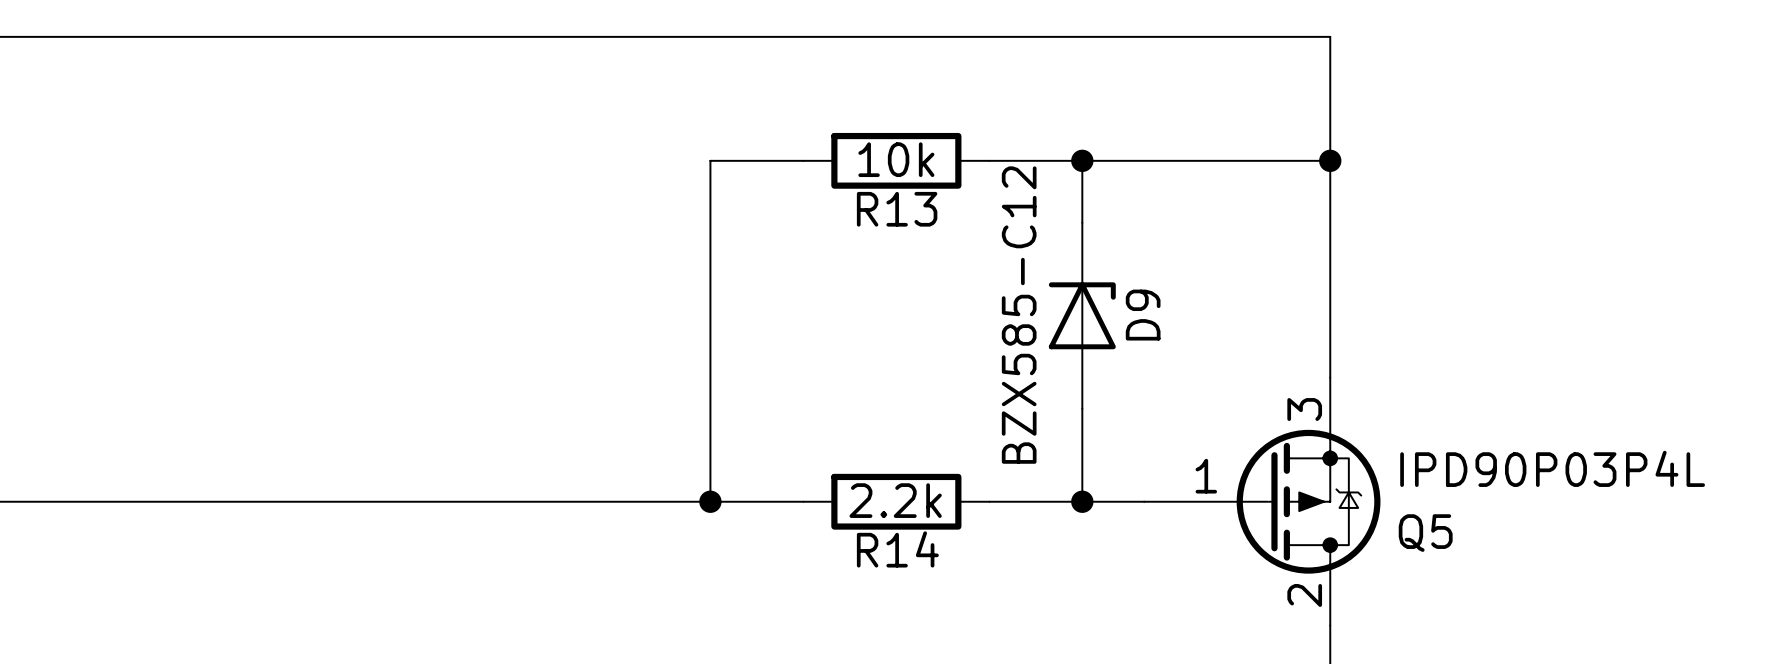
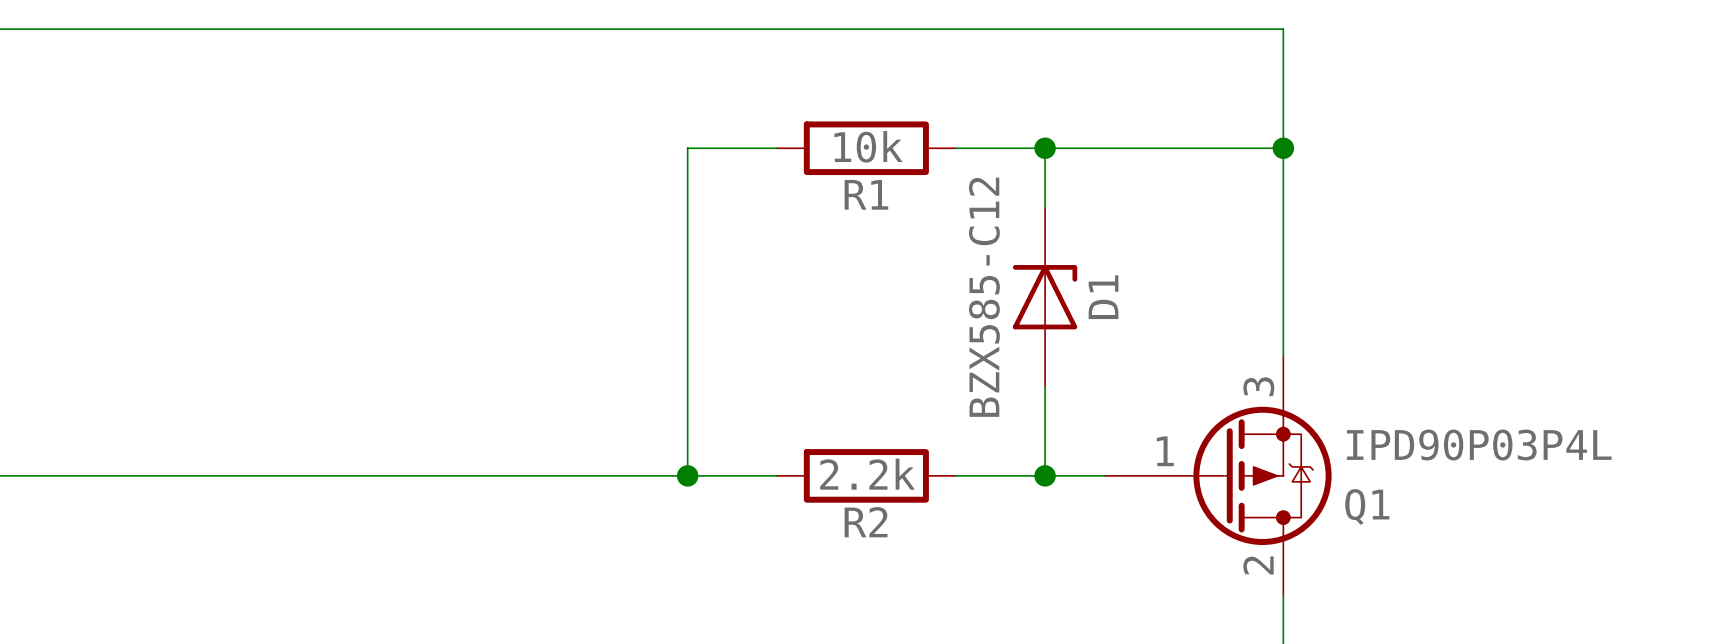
R13 name: R13 (897, 209) -> R1 (866, 194)
D9 name: D9 (1143, 315) -> D1 (1103, 297)
Q5 name: Q5 (1425, 533) -> Q1 (1367, 506)
R14 name: R14 (897, 549) -> R2 (866, 522)

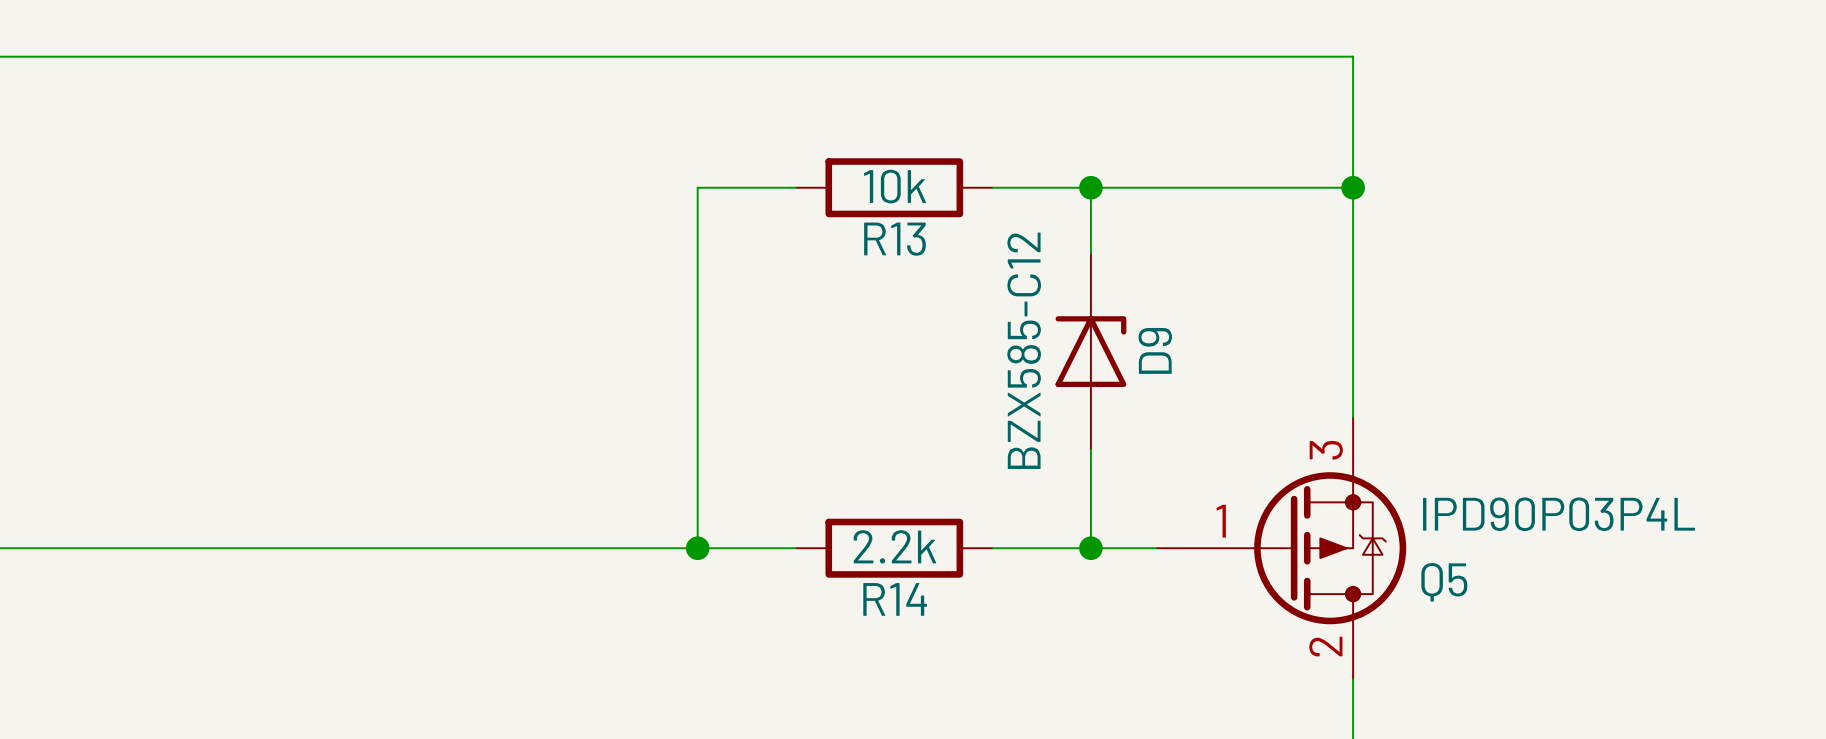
R1 name: R1 (866, 194) -> R13 (894, 239)
D1 name: D1 (1103, 297) -> D9 (1155, 350)
Q1 name: Q1 (1367, 506) -> Q5 (1444, 582)
R2 name: R2 (866, 522) -> R14 (895, 599)

